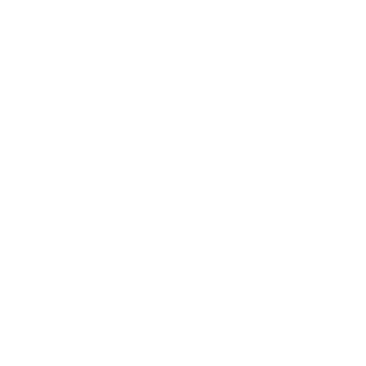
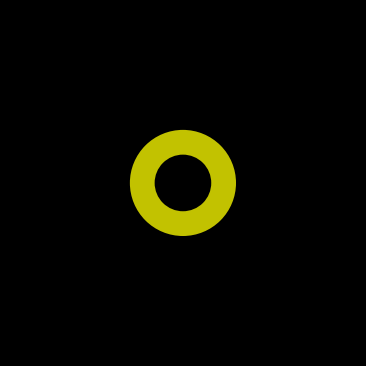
part: none -> (182, 182)

